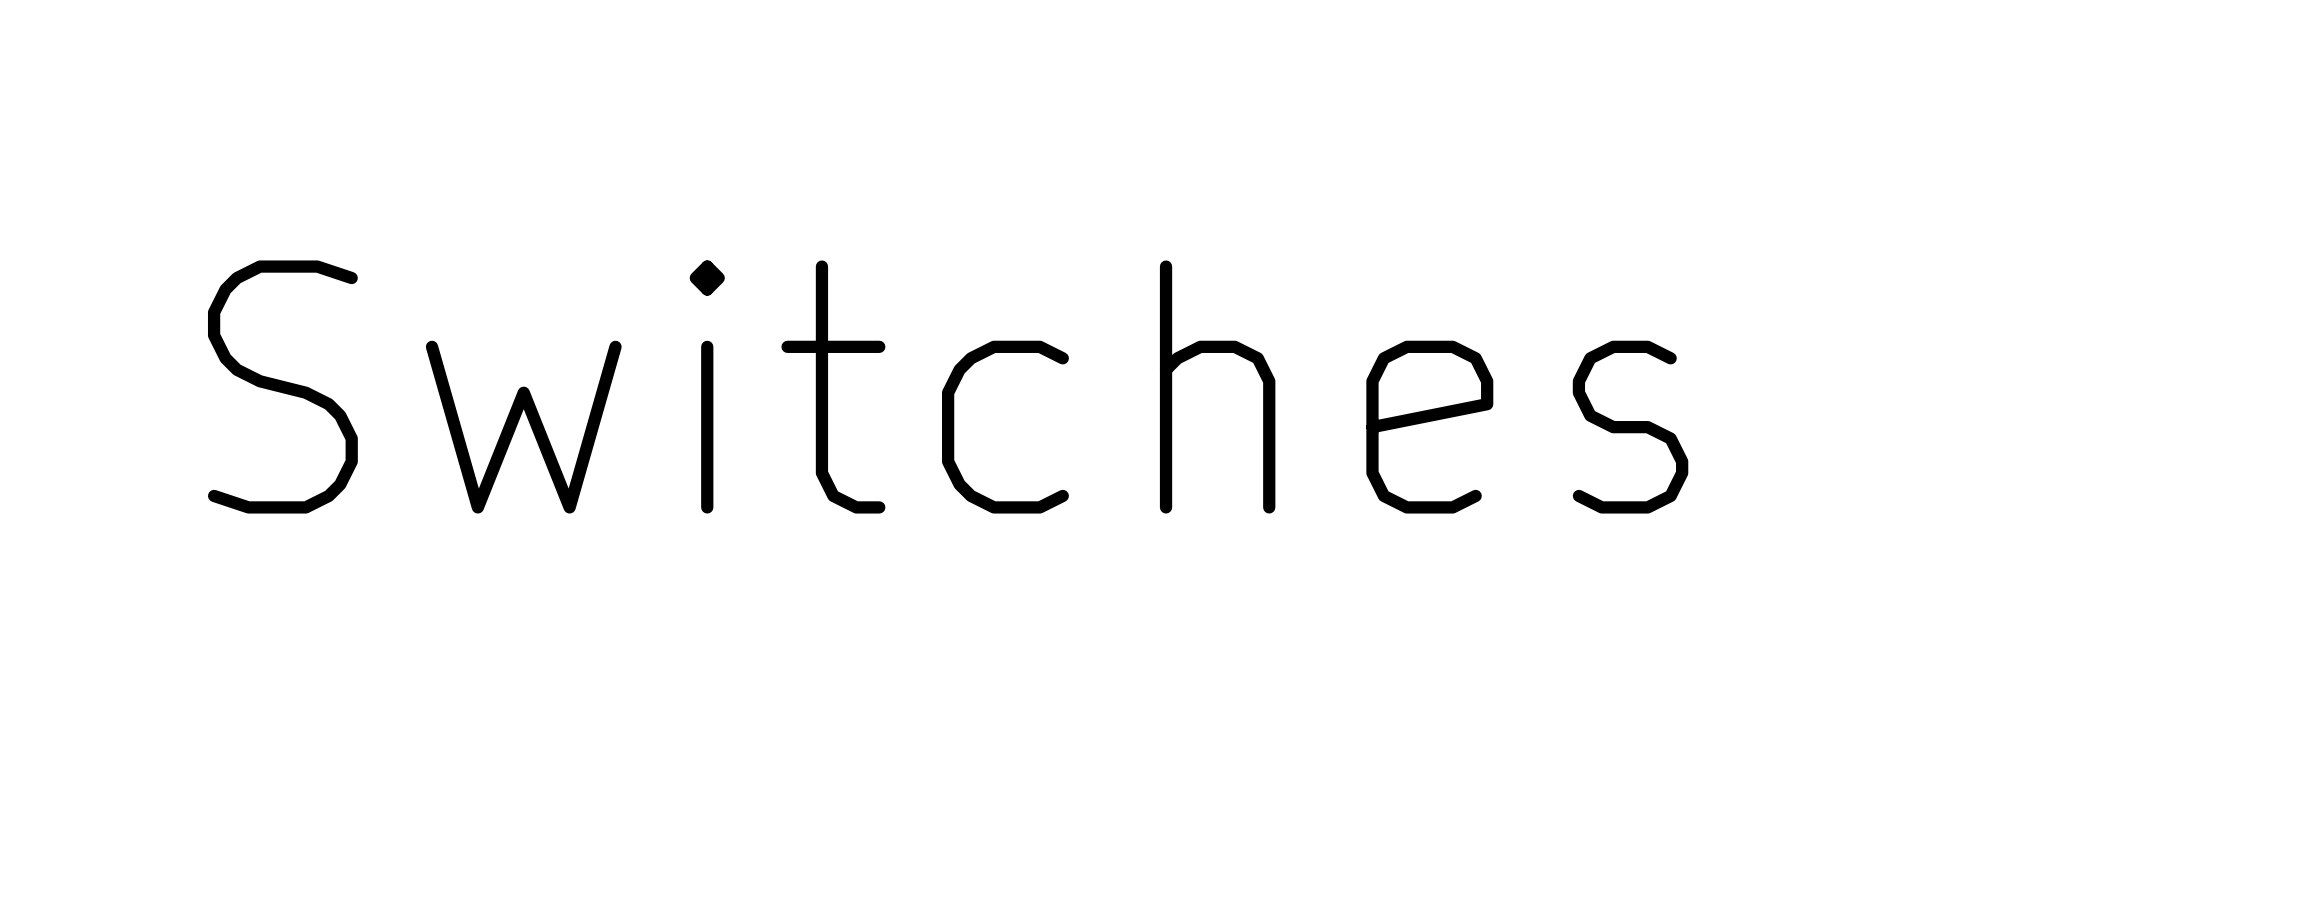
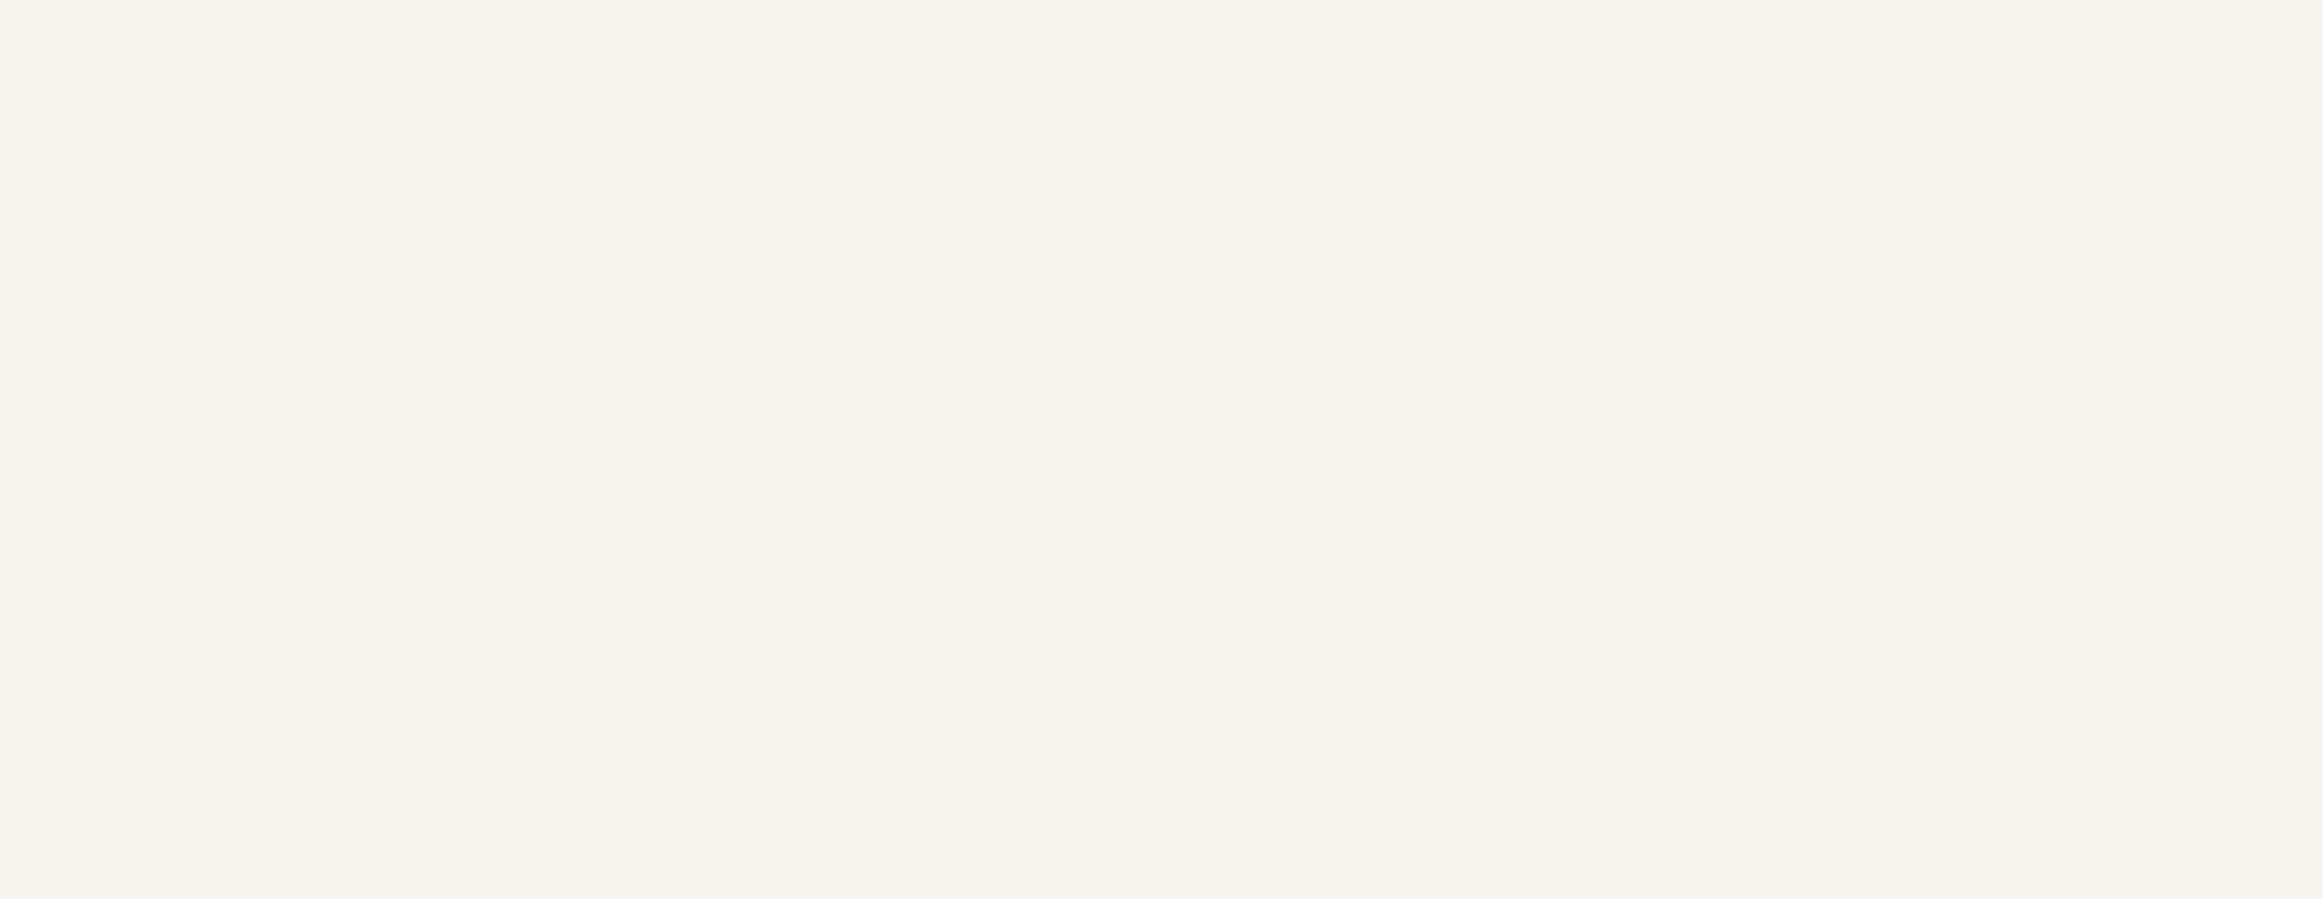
label: Switches (948, 386) -> none

